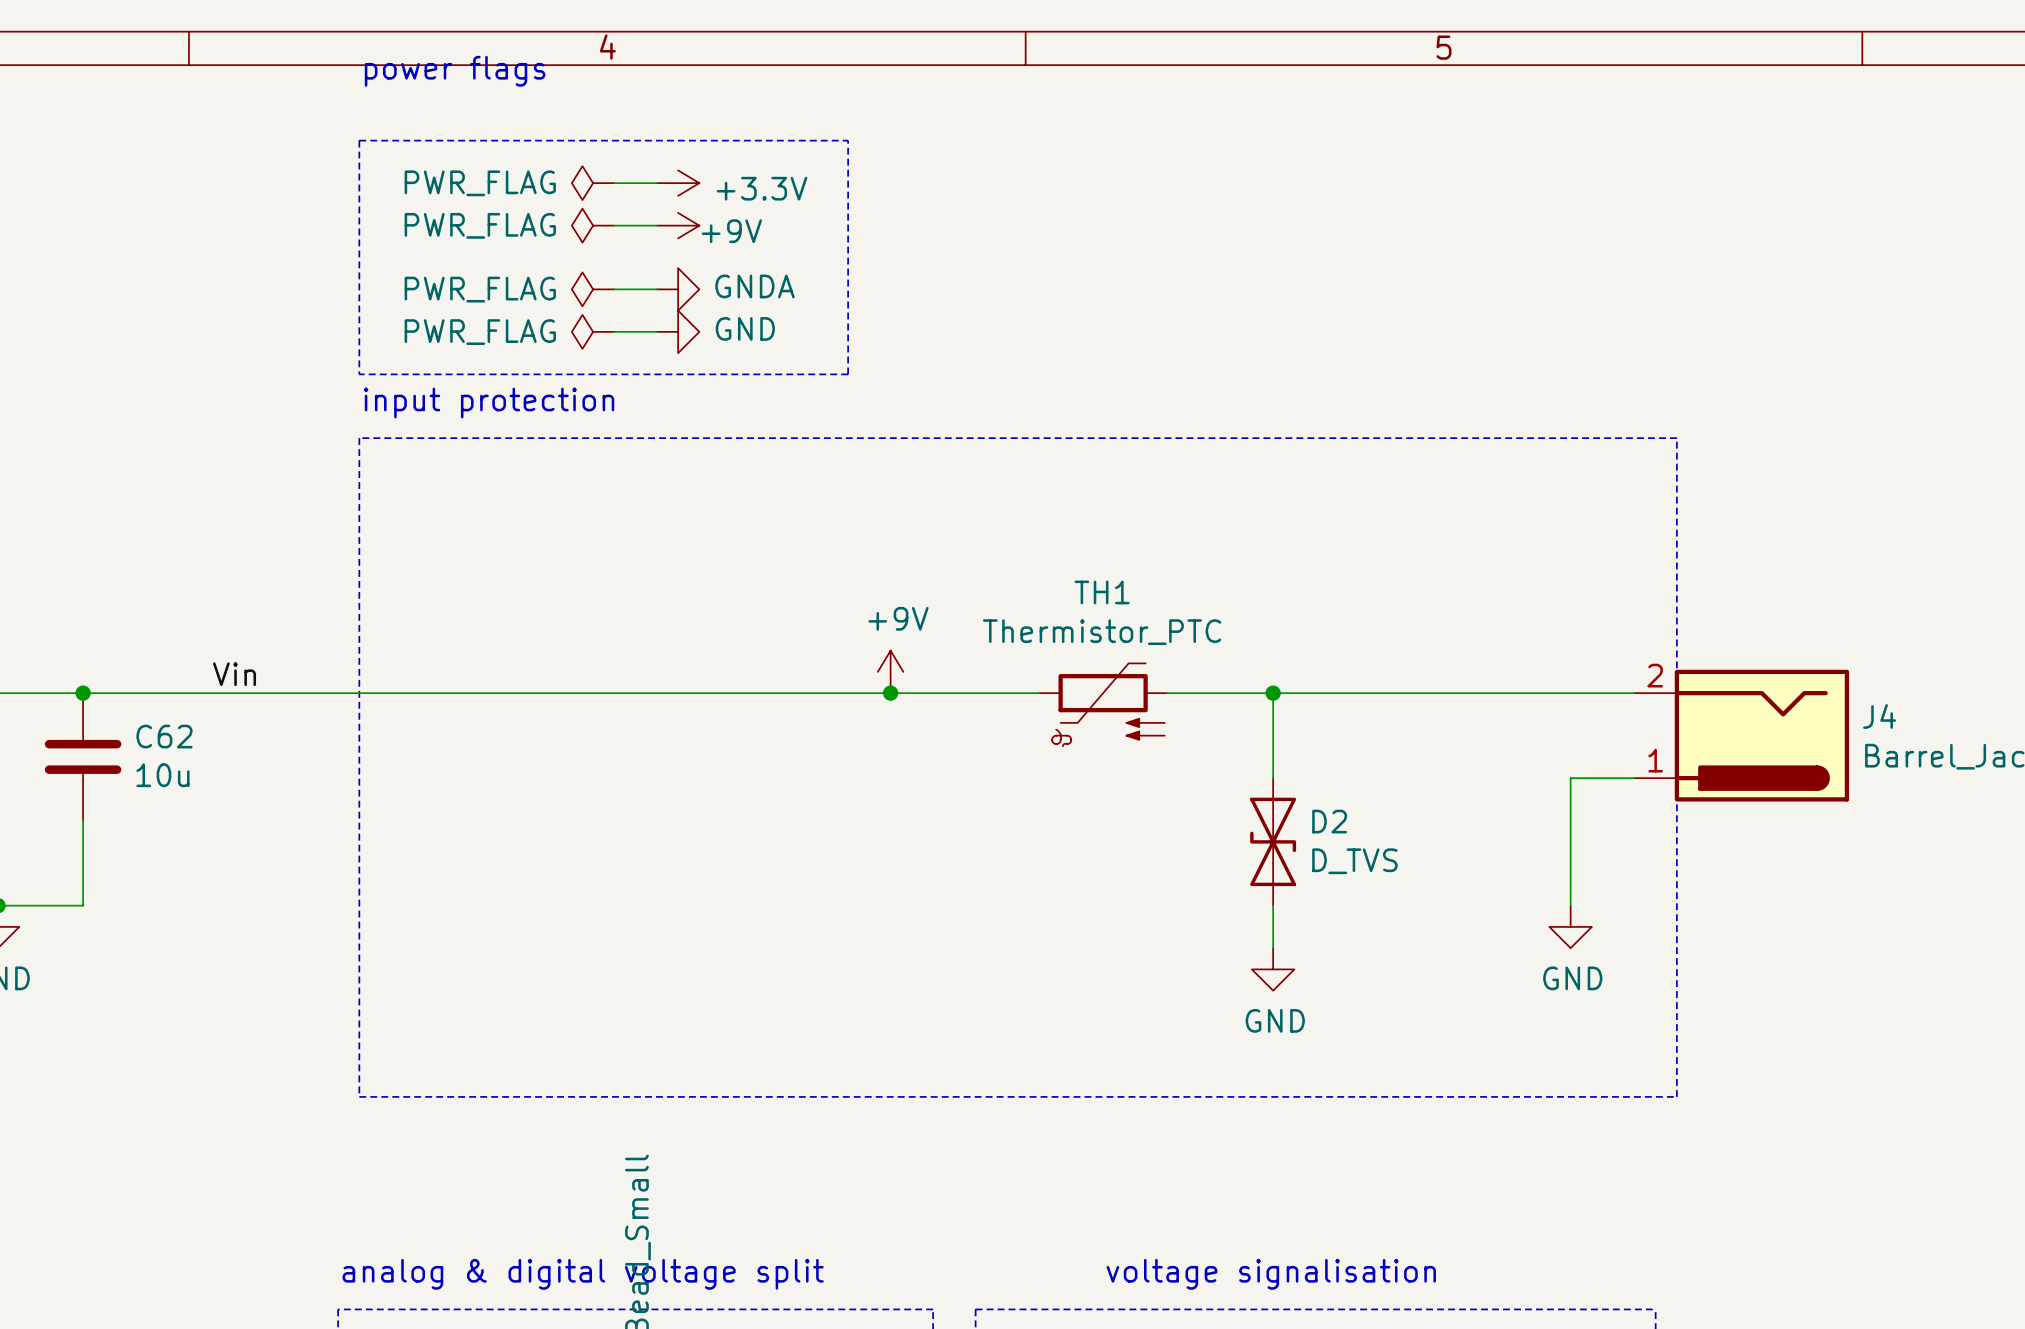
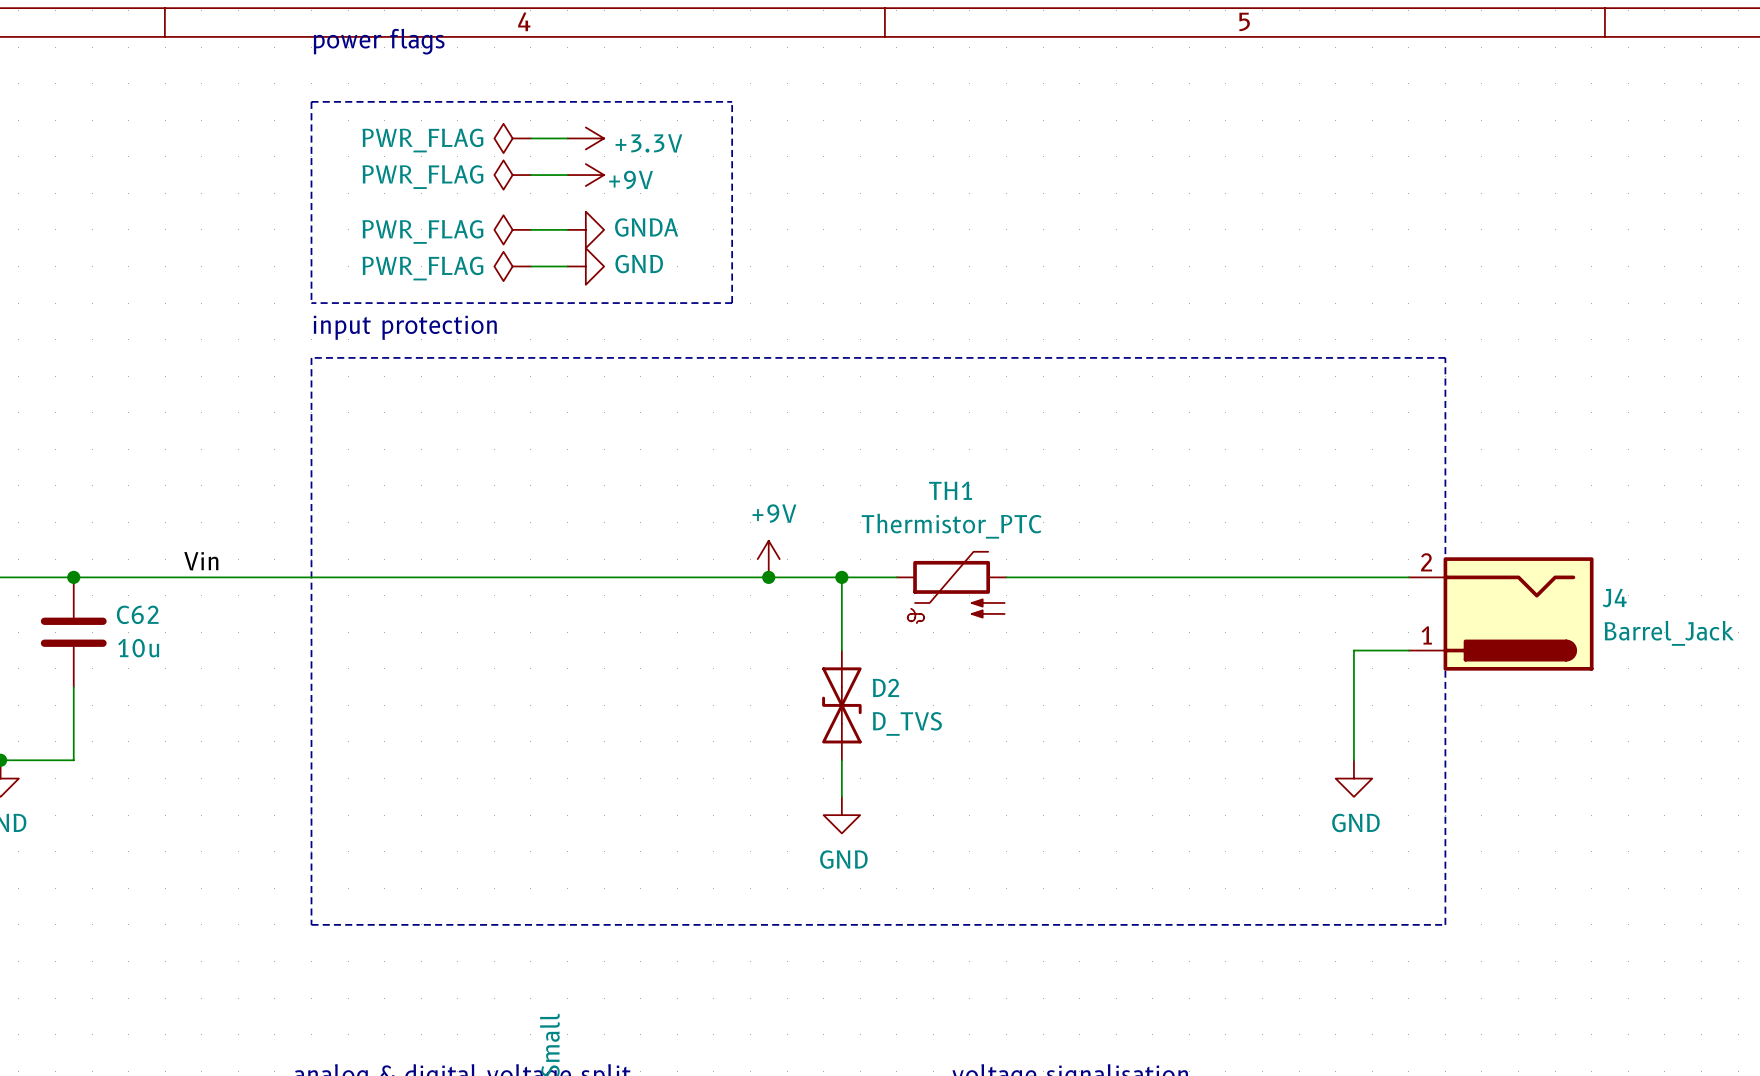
junction: none -> (841, 577)
wire: (1273, 693) (1273, 778) -> (841, 577) (841, 650)
junction: (1273, 693) -> none
D2 position: (1273, 841) -> (841, 705)
wire: (1273, 905) (1273, 948) -> (841, 760) (841, 796)
power symbol position: GND (1273, 969) -> GND (841, 815)

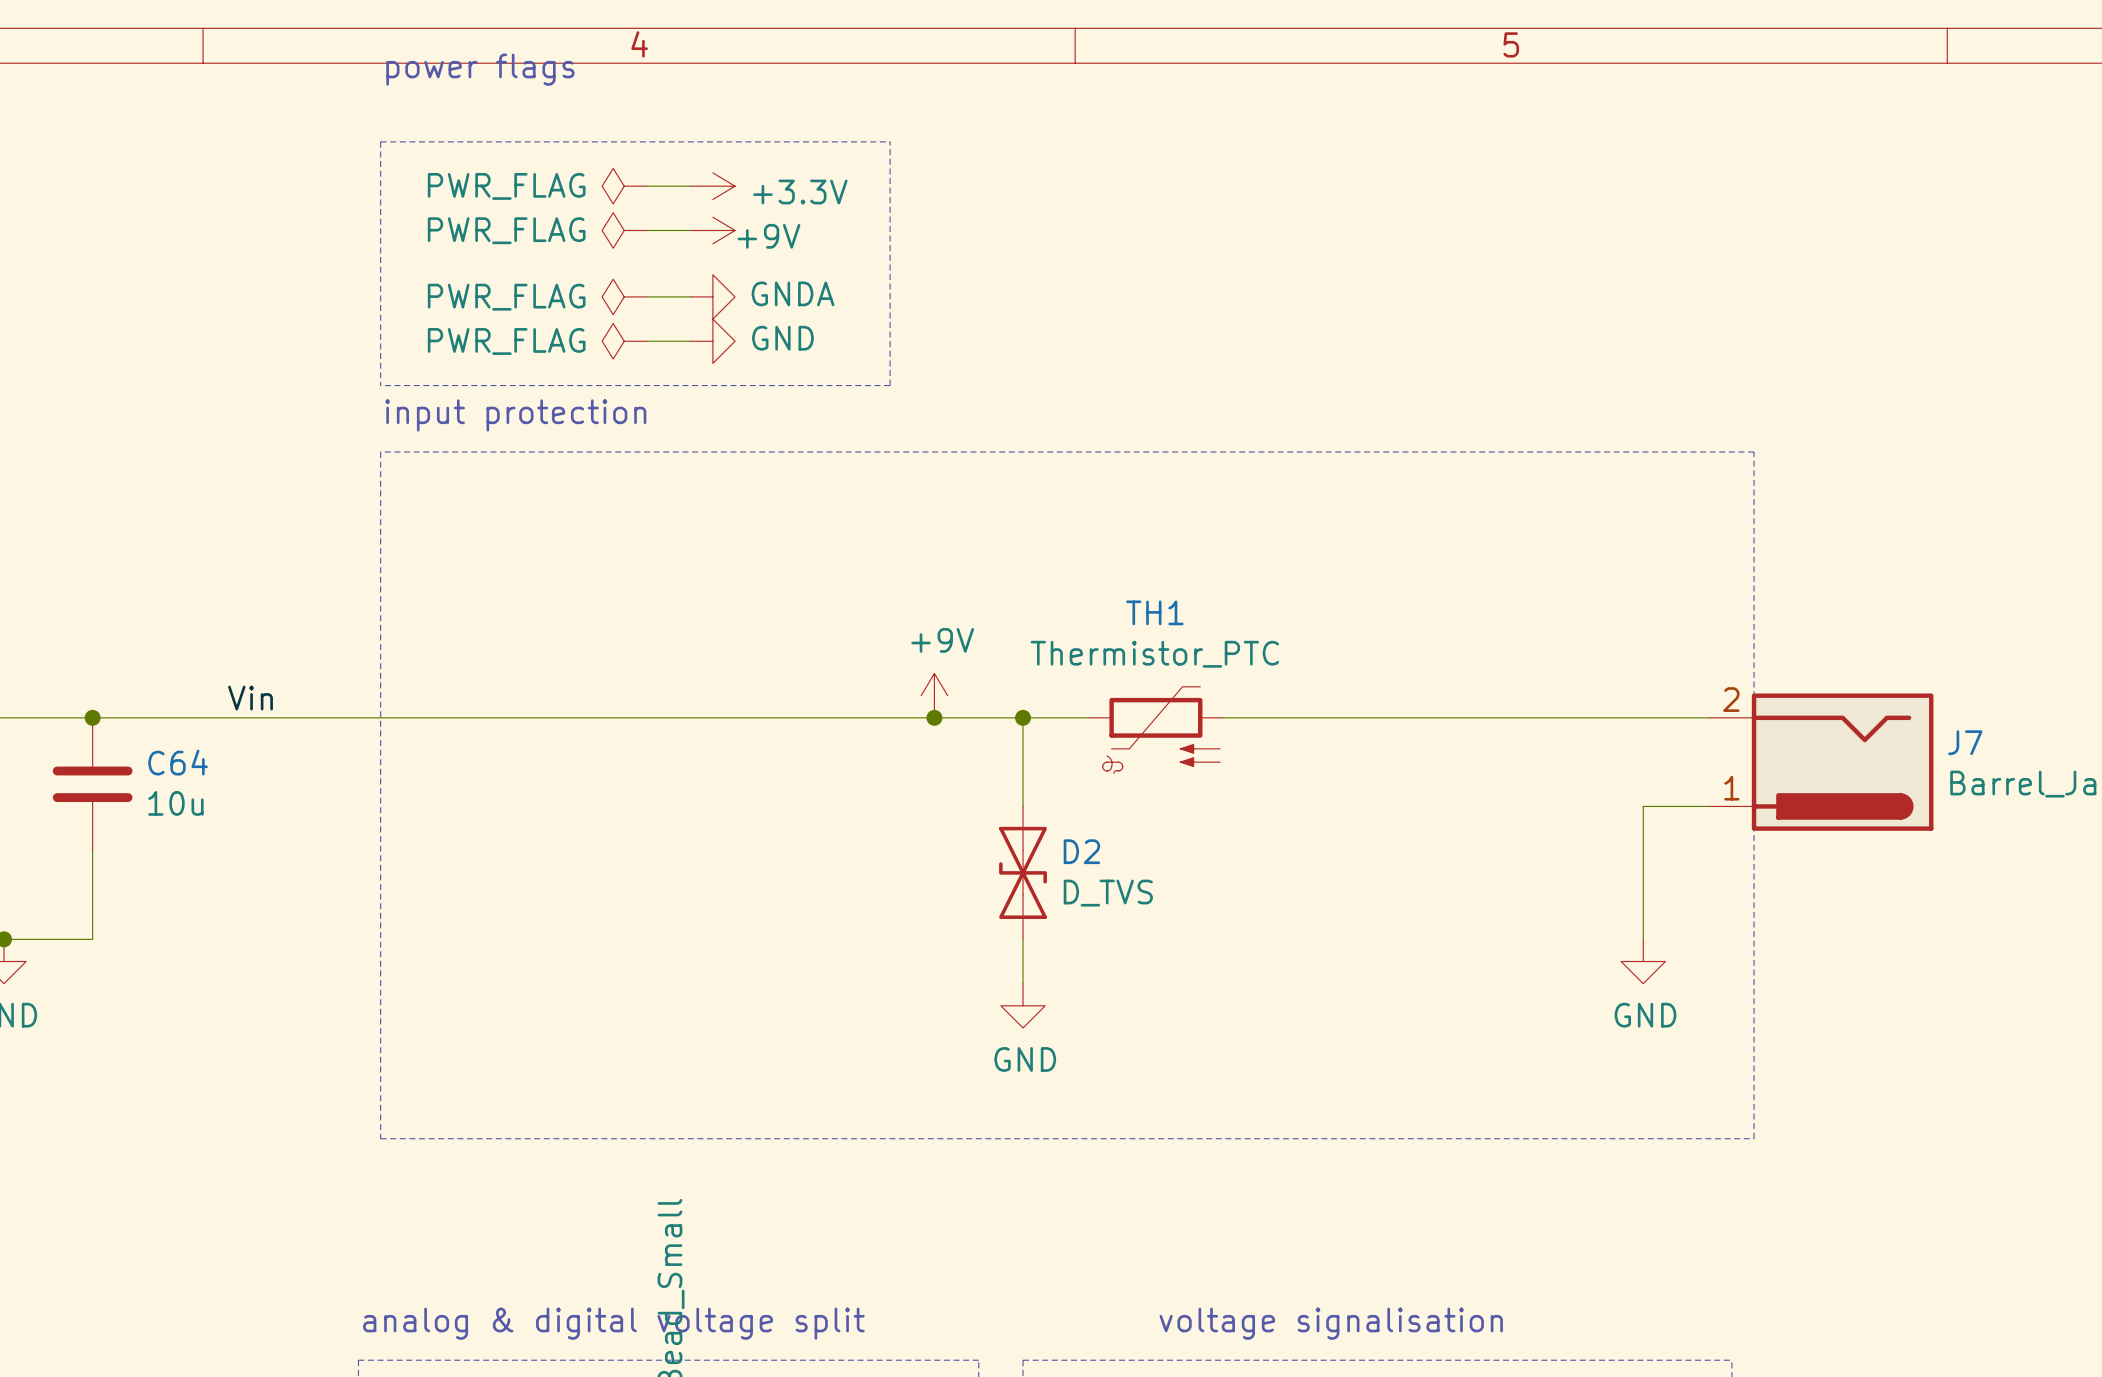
J4 name: J4 (1614, 598) -> J7 (1965, 742)
C62 name: C62 (137, 614) -> C64 (178, 762)

